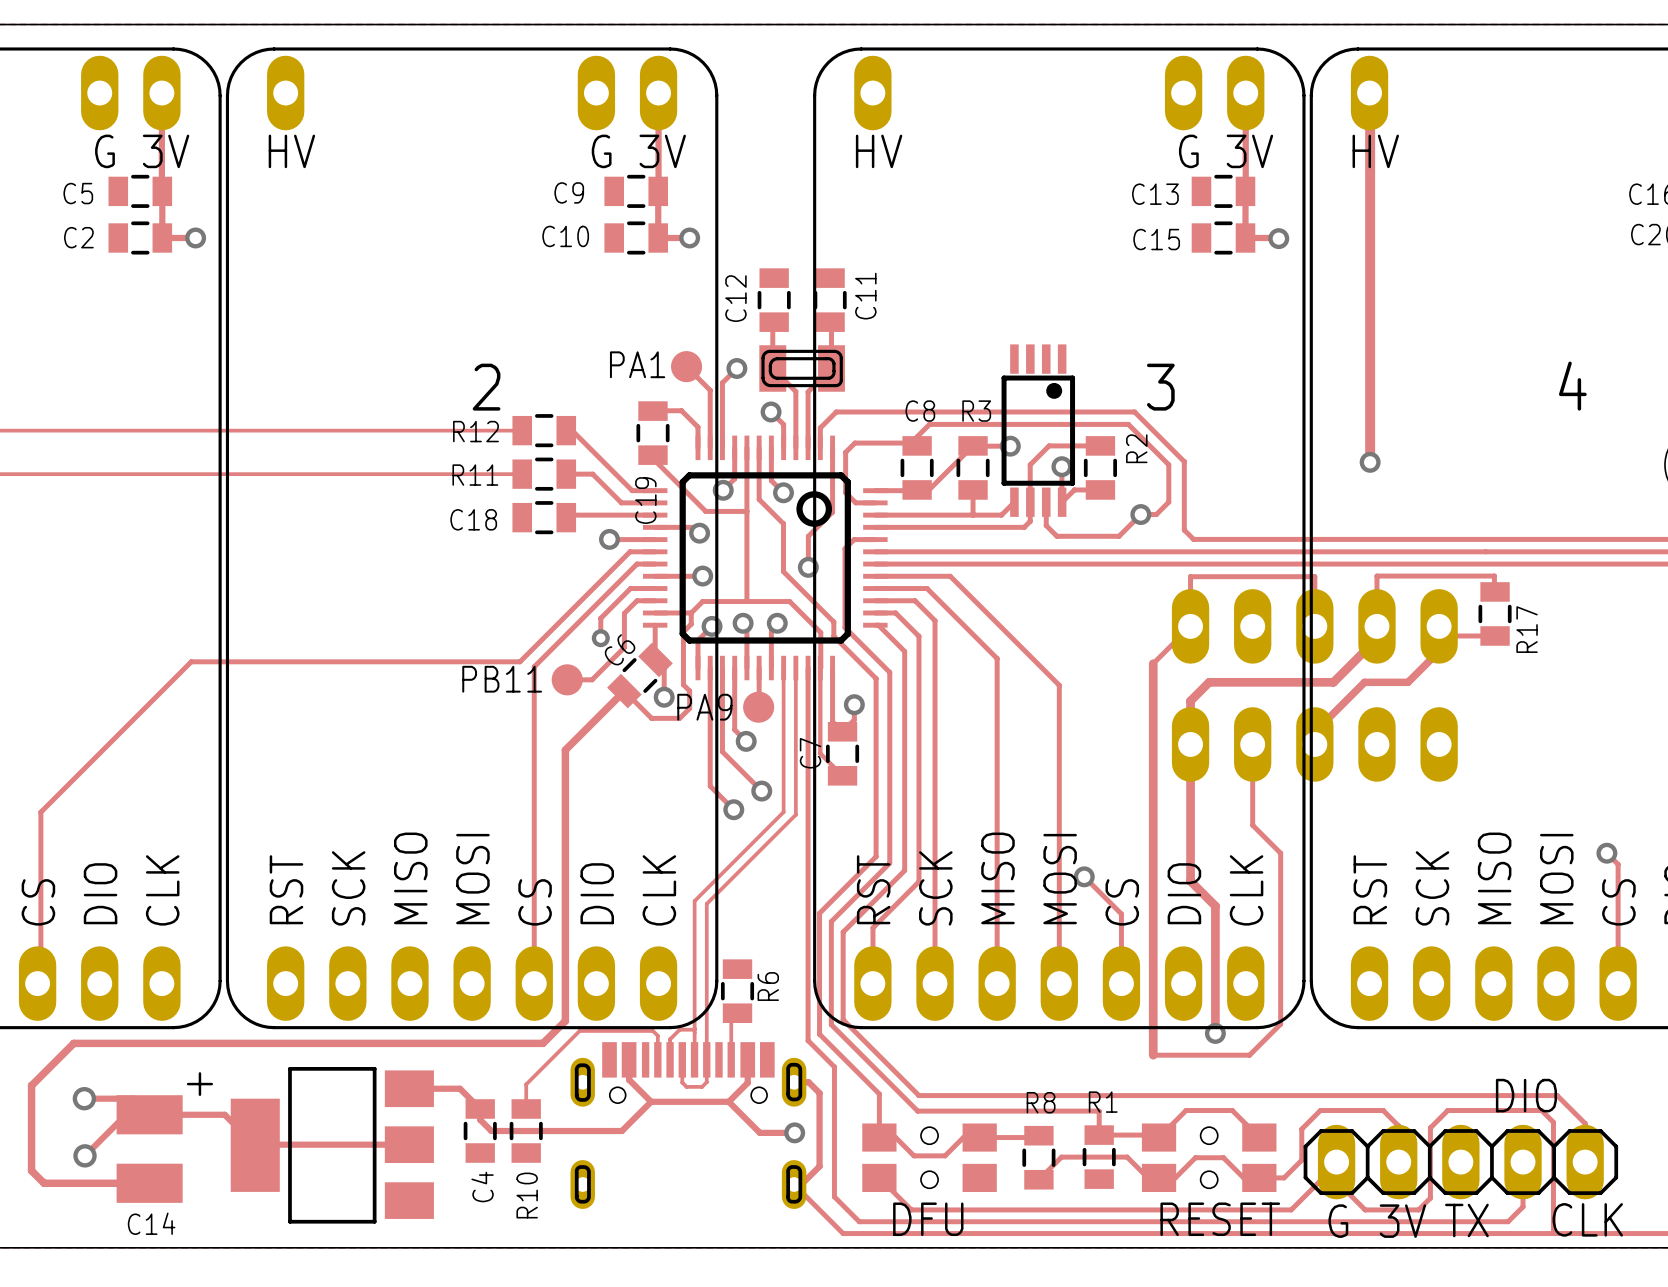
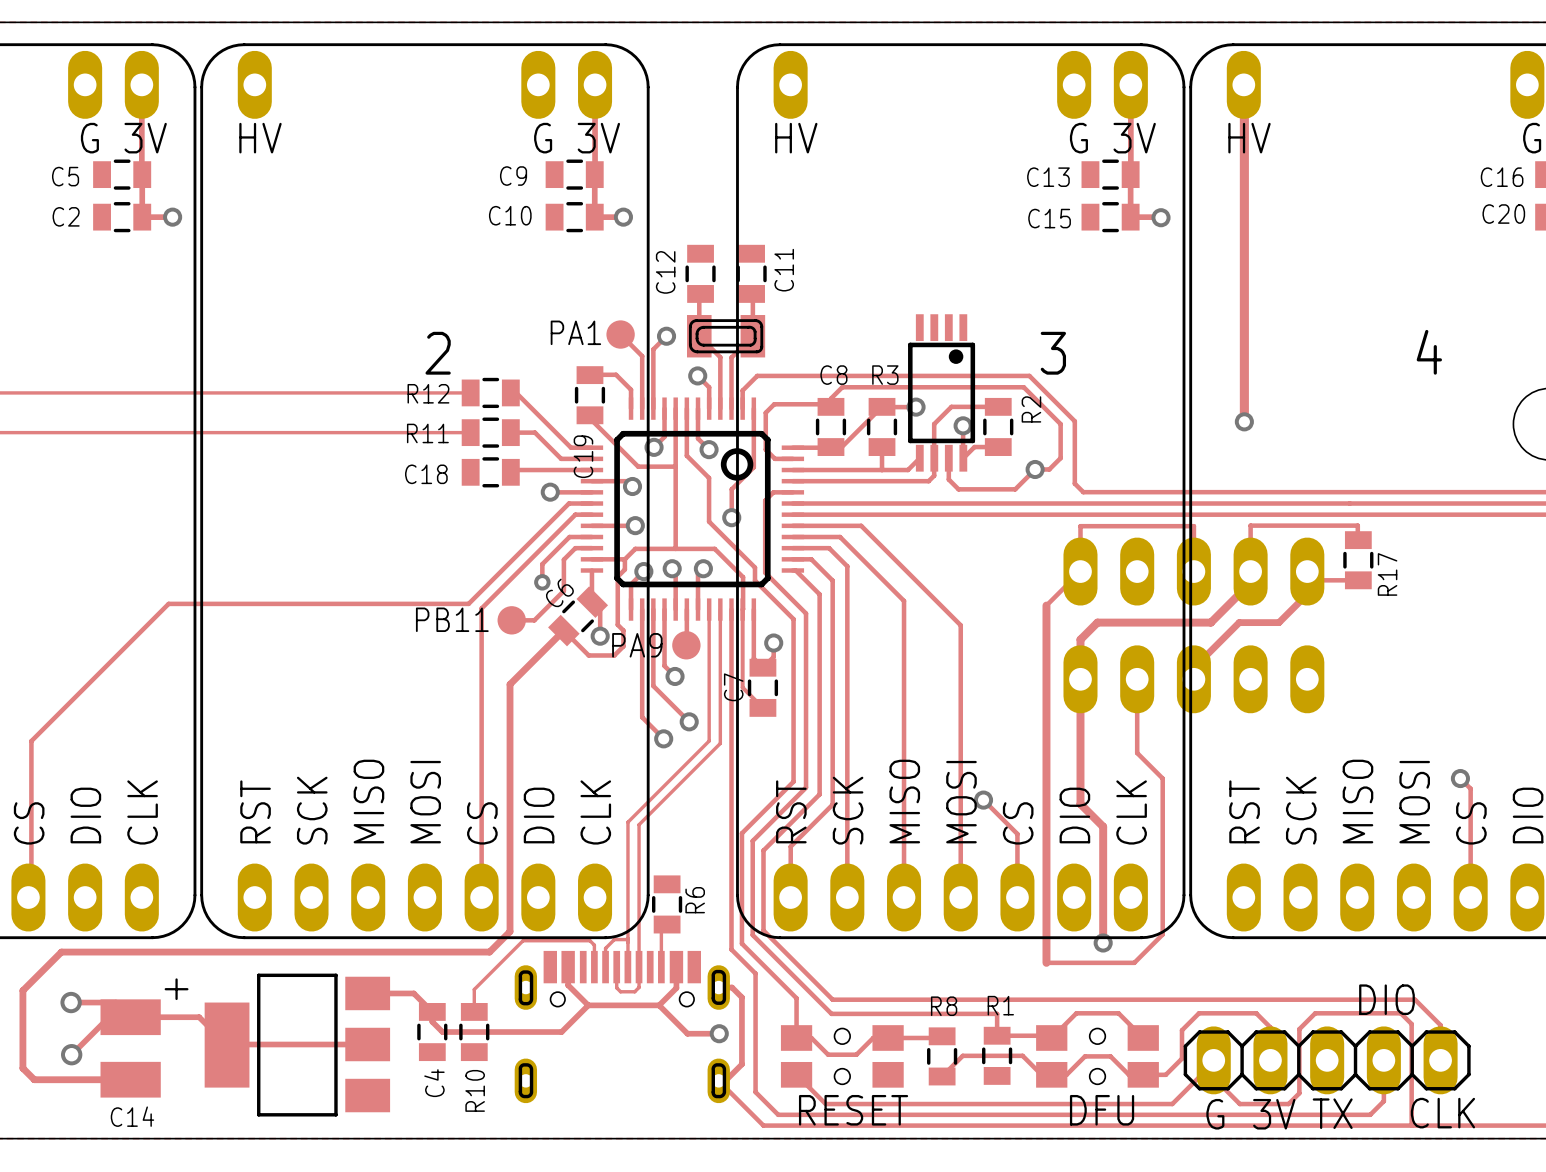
text position: DFU (928, 1219) -> DFU (1102, 1110)
text position: RESET (1220, 1219) -> RESET (853, 1110)

